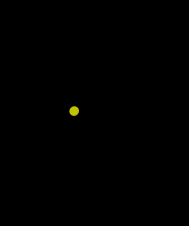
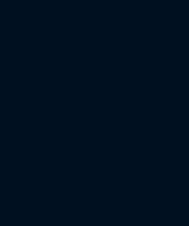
board edge: (74, 110) (74, 111) -> none

